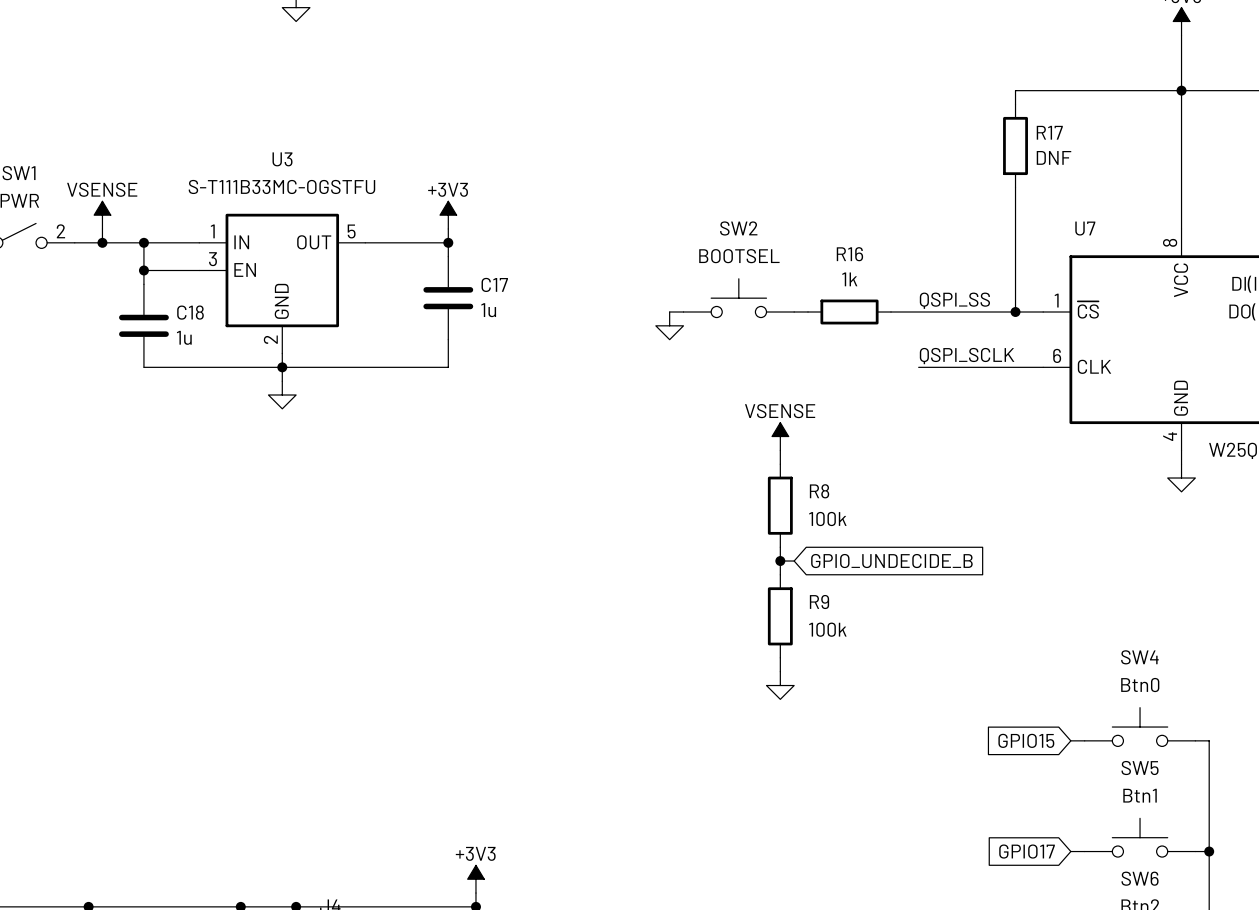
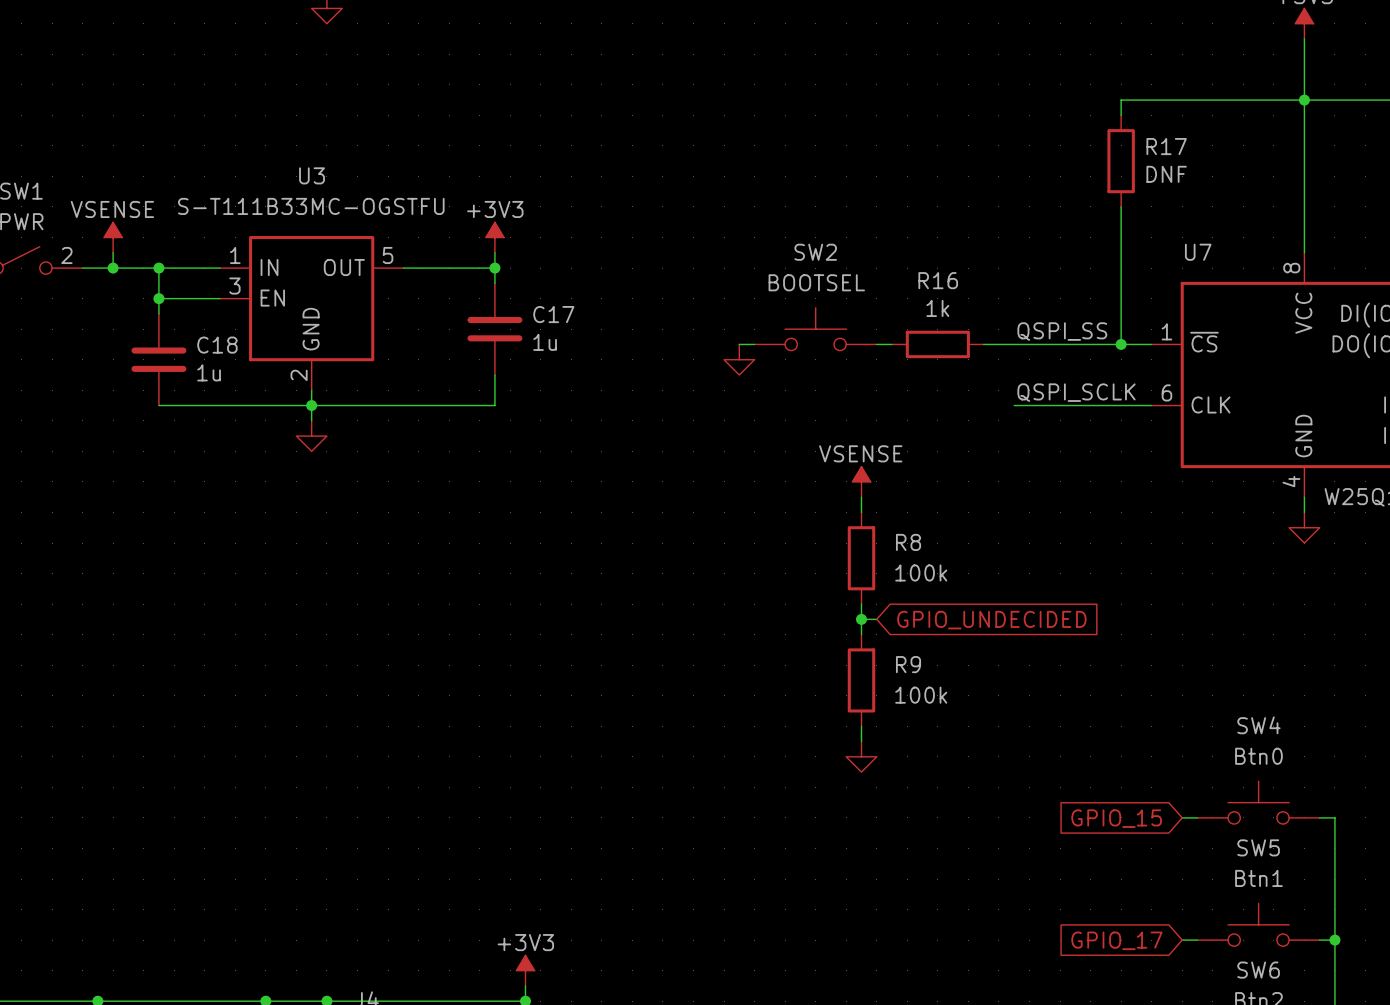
global label: GPIO_UNDECIDE_B (891, 561) -> GPIO_UNDECIDED (991, 620)
global label: GPIO15 (1026, 740) -> GPIO_15 (1116, 818)
global label: GPIO17 (1027, 851) -> GPIO_17 (1116, 940)

